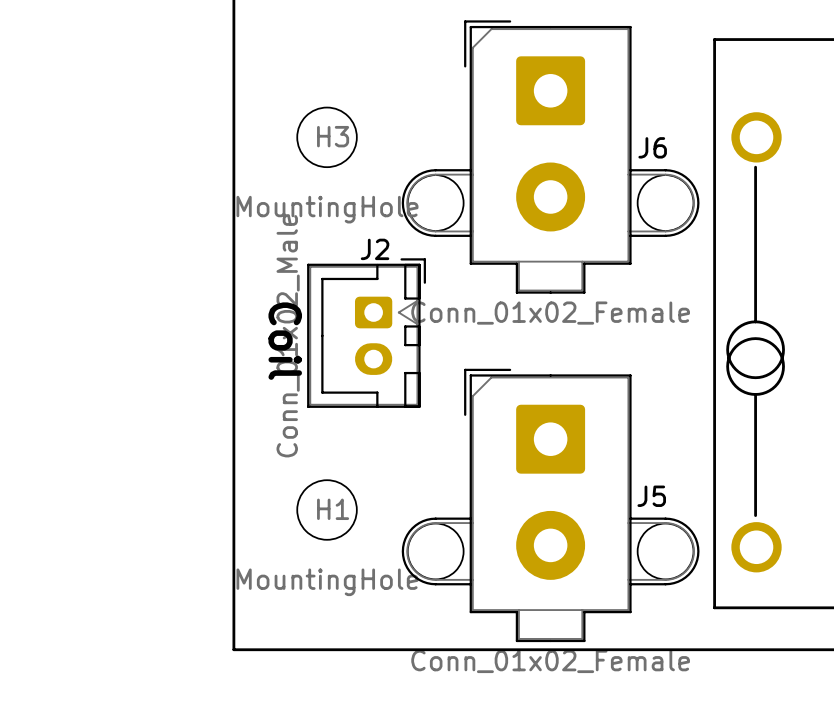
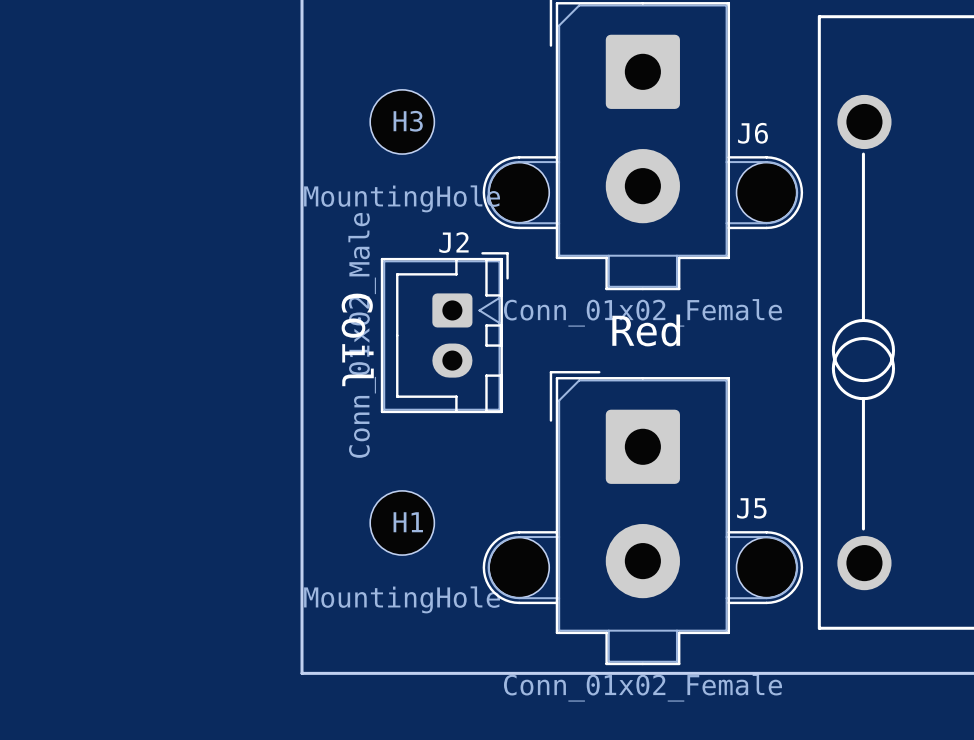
text: none -> Red (646, 330)

